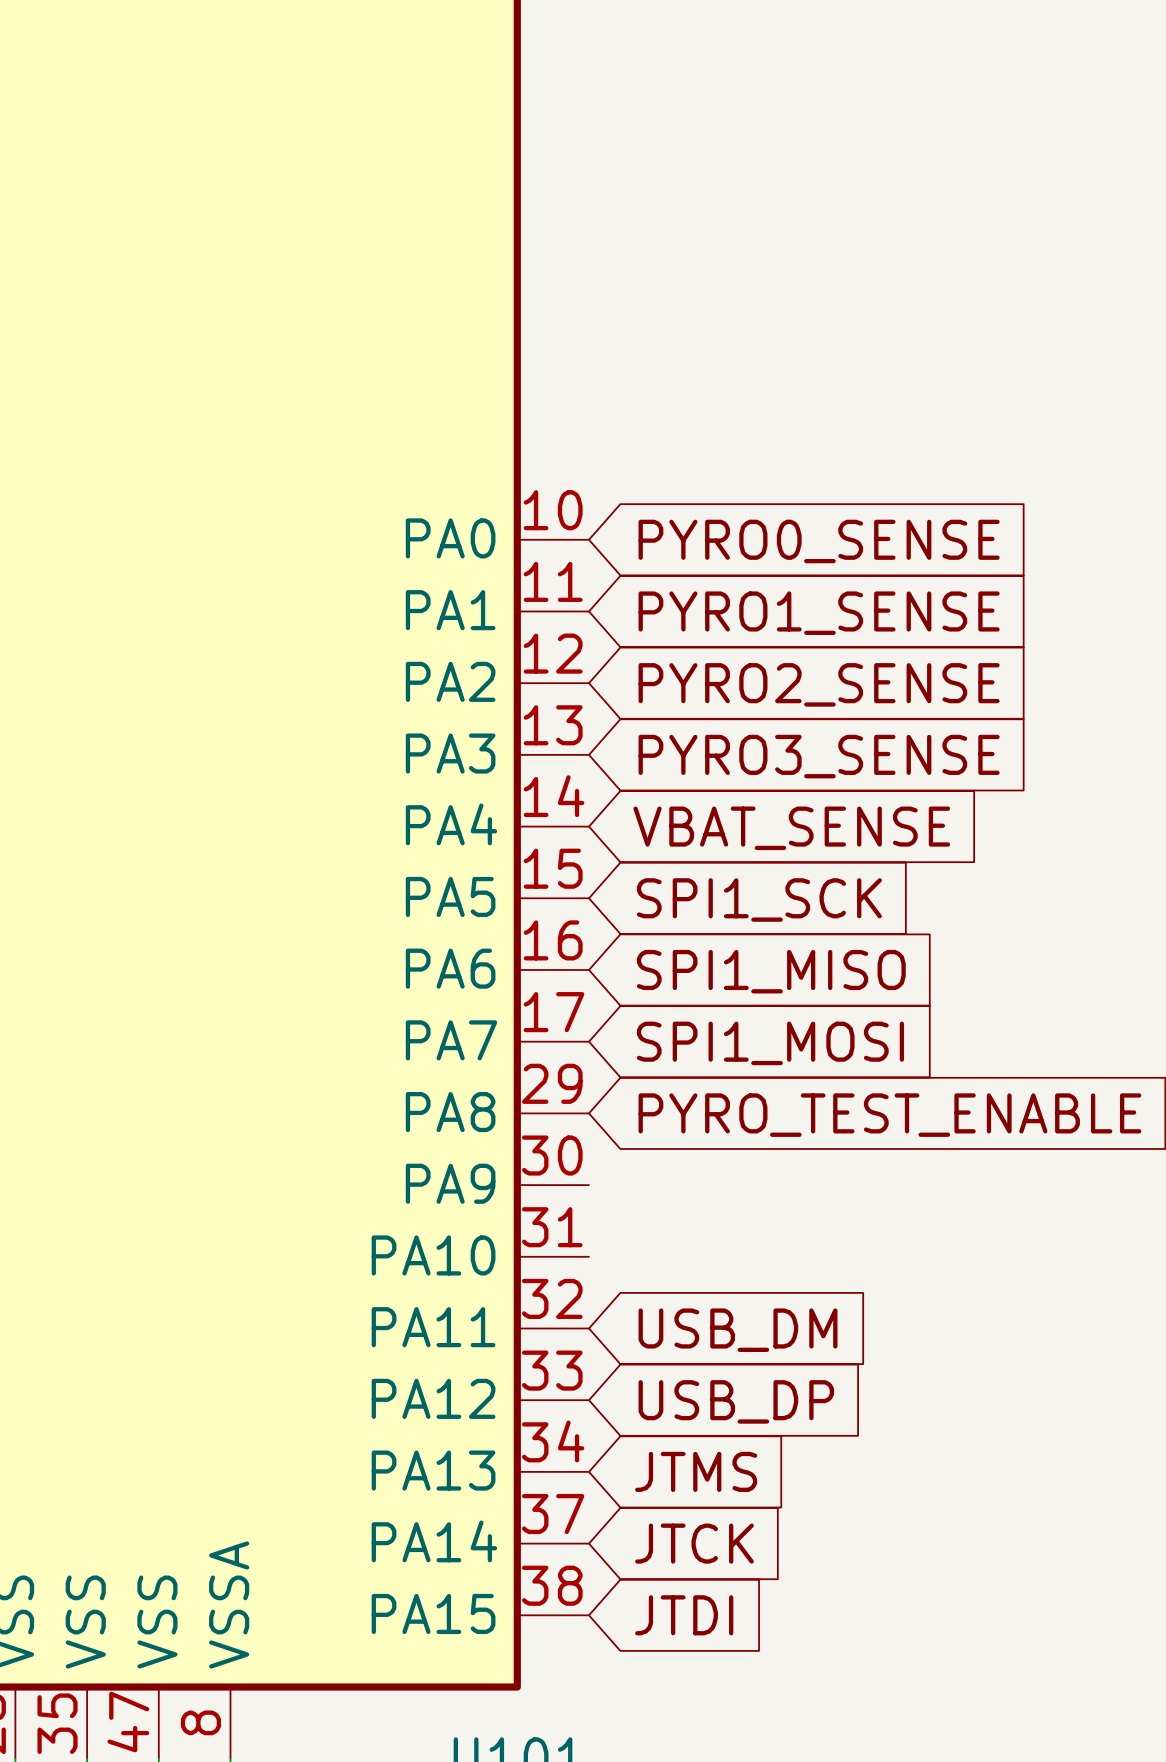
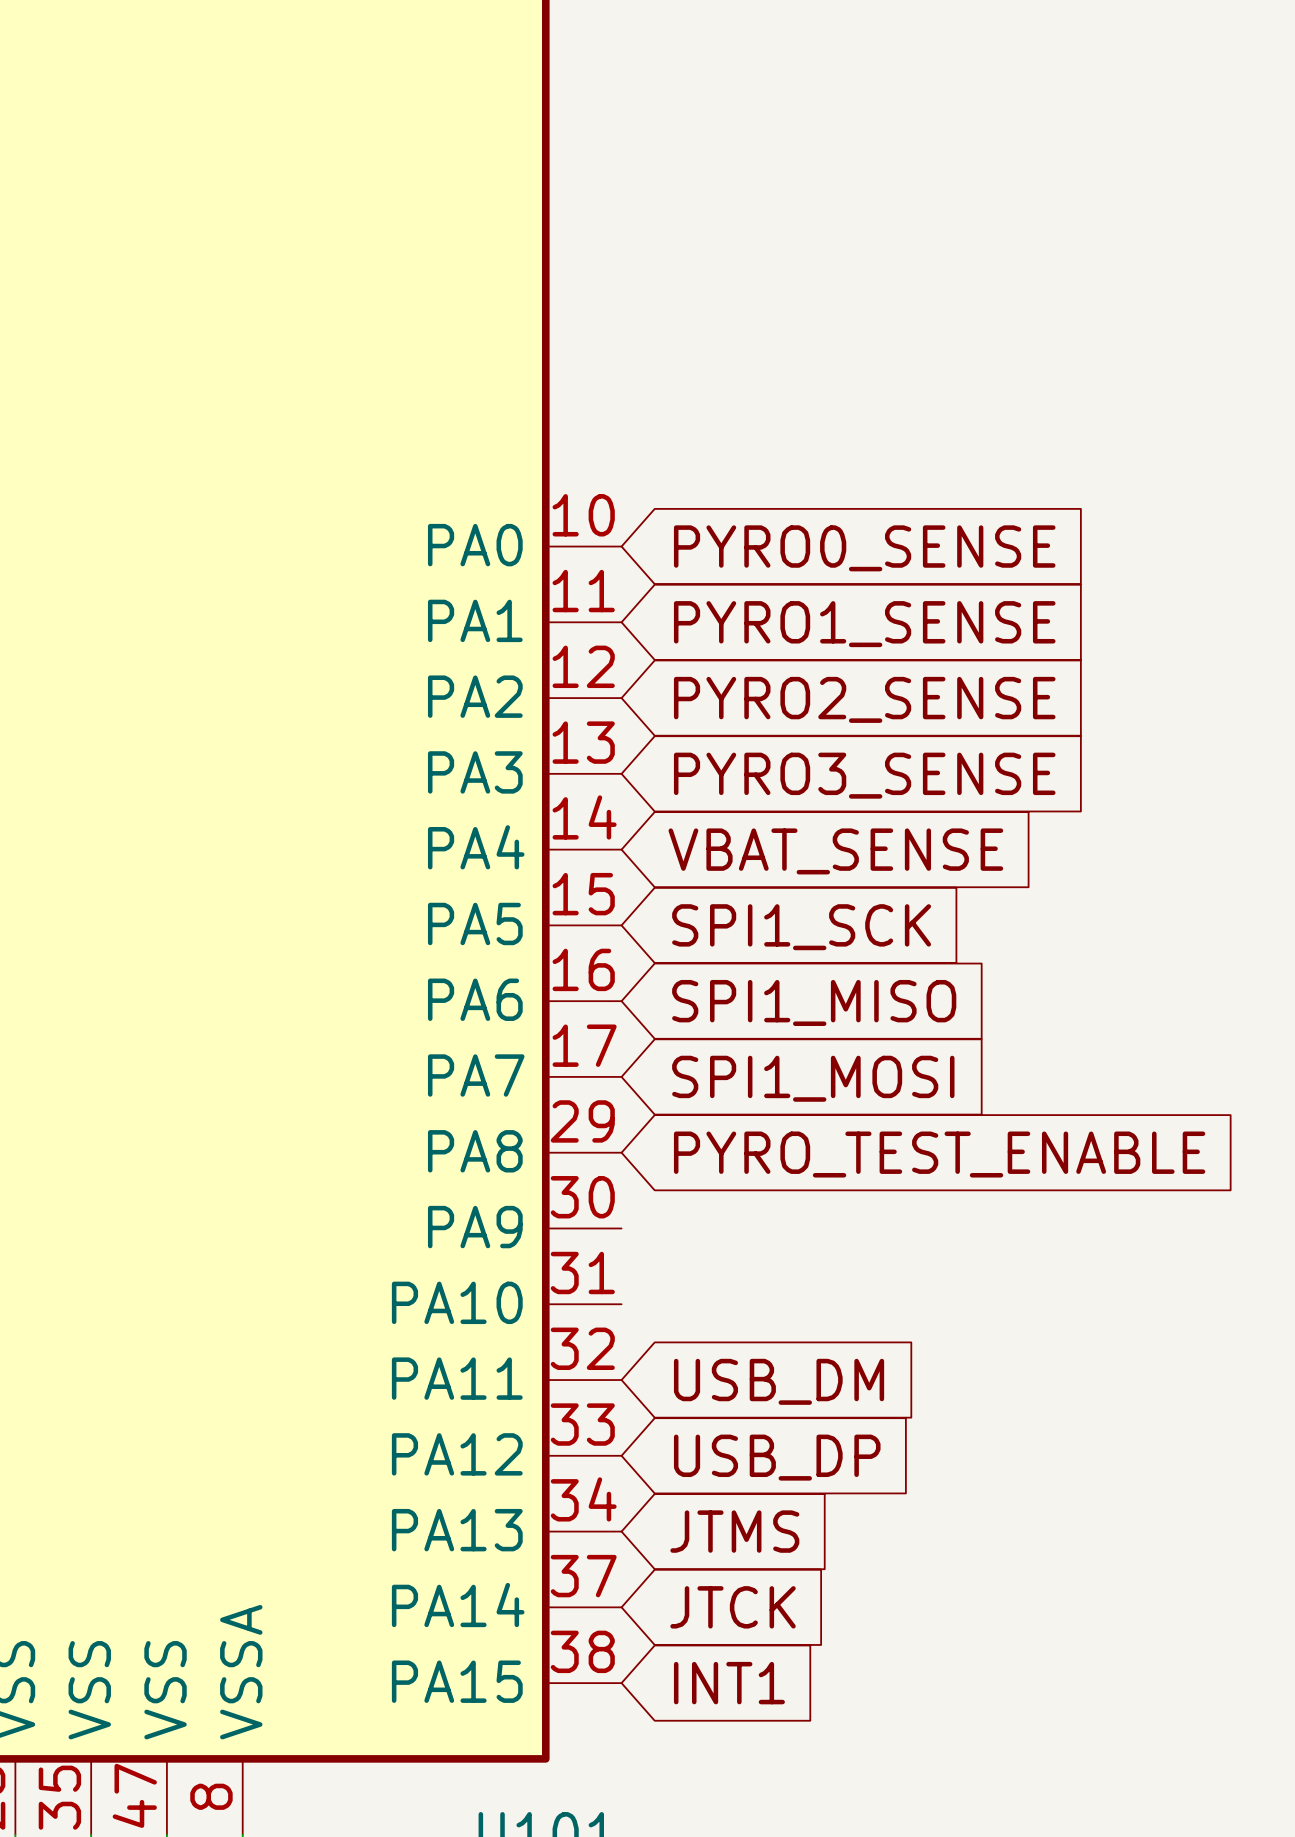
global label: JTDI (684, 1615) -> INT1 (729, 1683)

